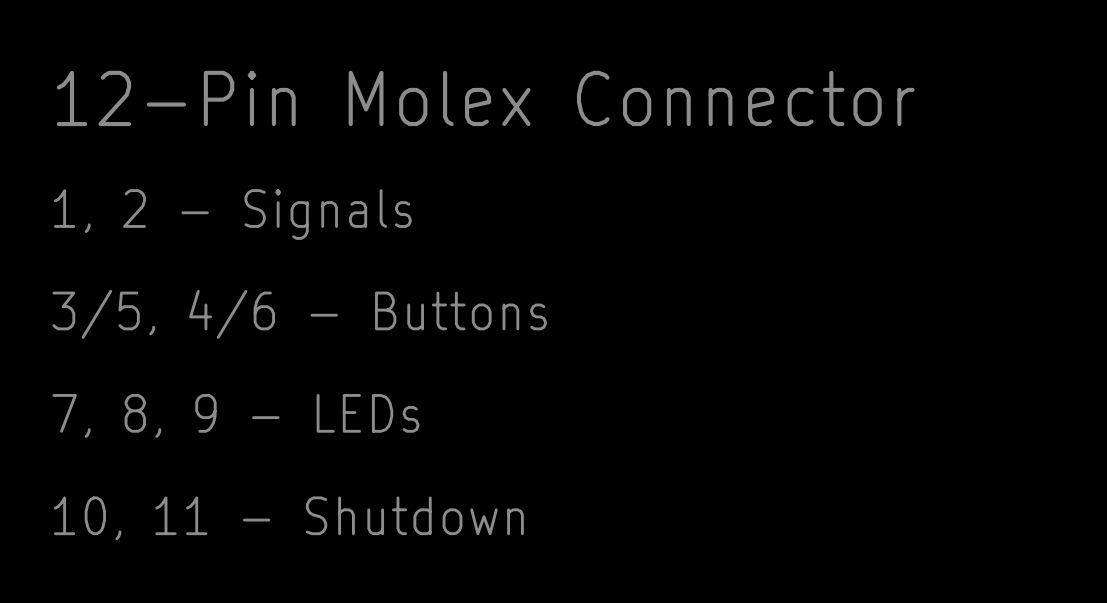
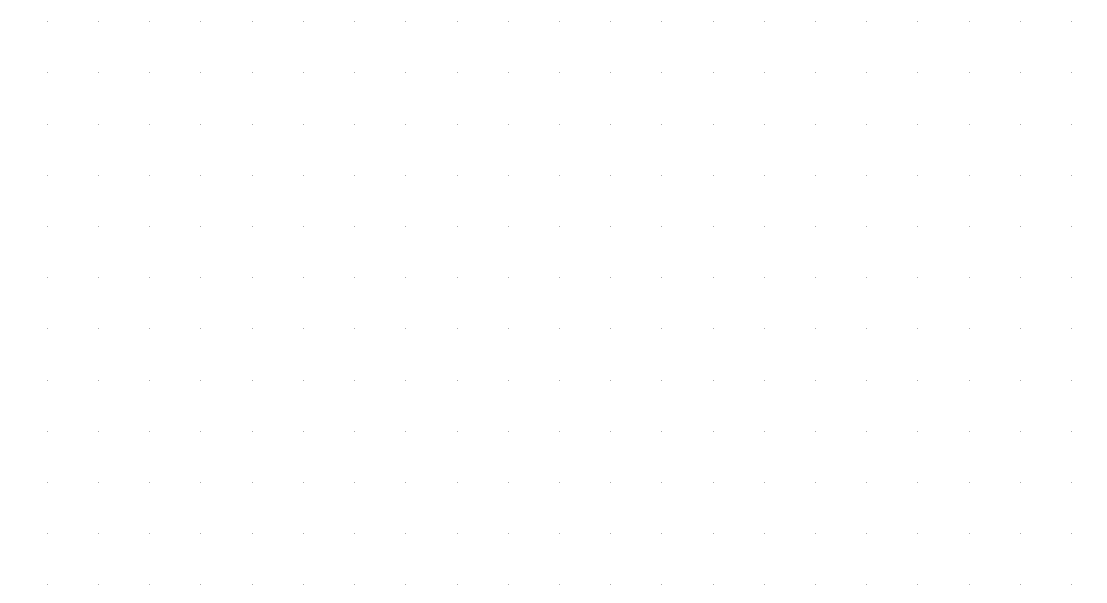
text: 12-Pin Molex Connector (485, 98) -> none
text: 1, 2 - Signals (232, 214) -> none
text: 3/5, 4/6 - Buttons (299, 314) -> none
text: 7, 8, 9 - LEDs (235, 415) -> none
text: 10, 11 - Shutdown (288, 518) -> none

